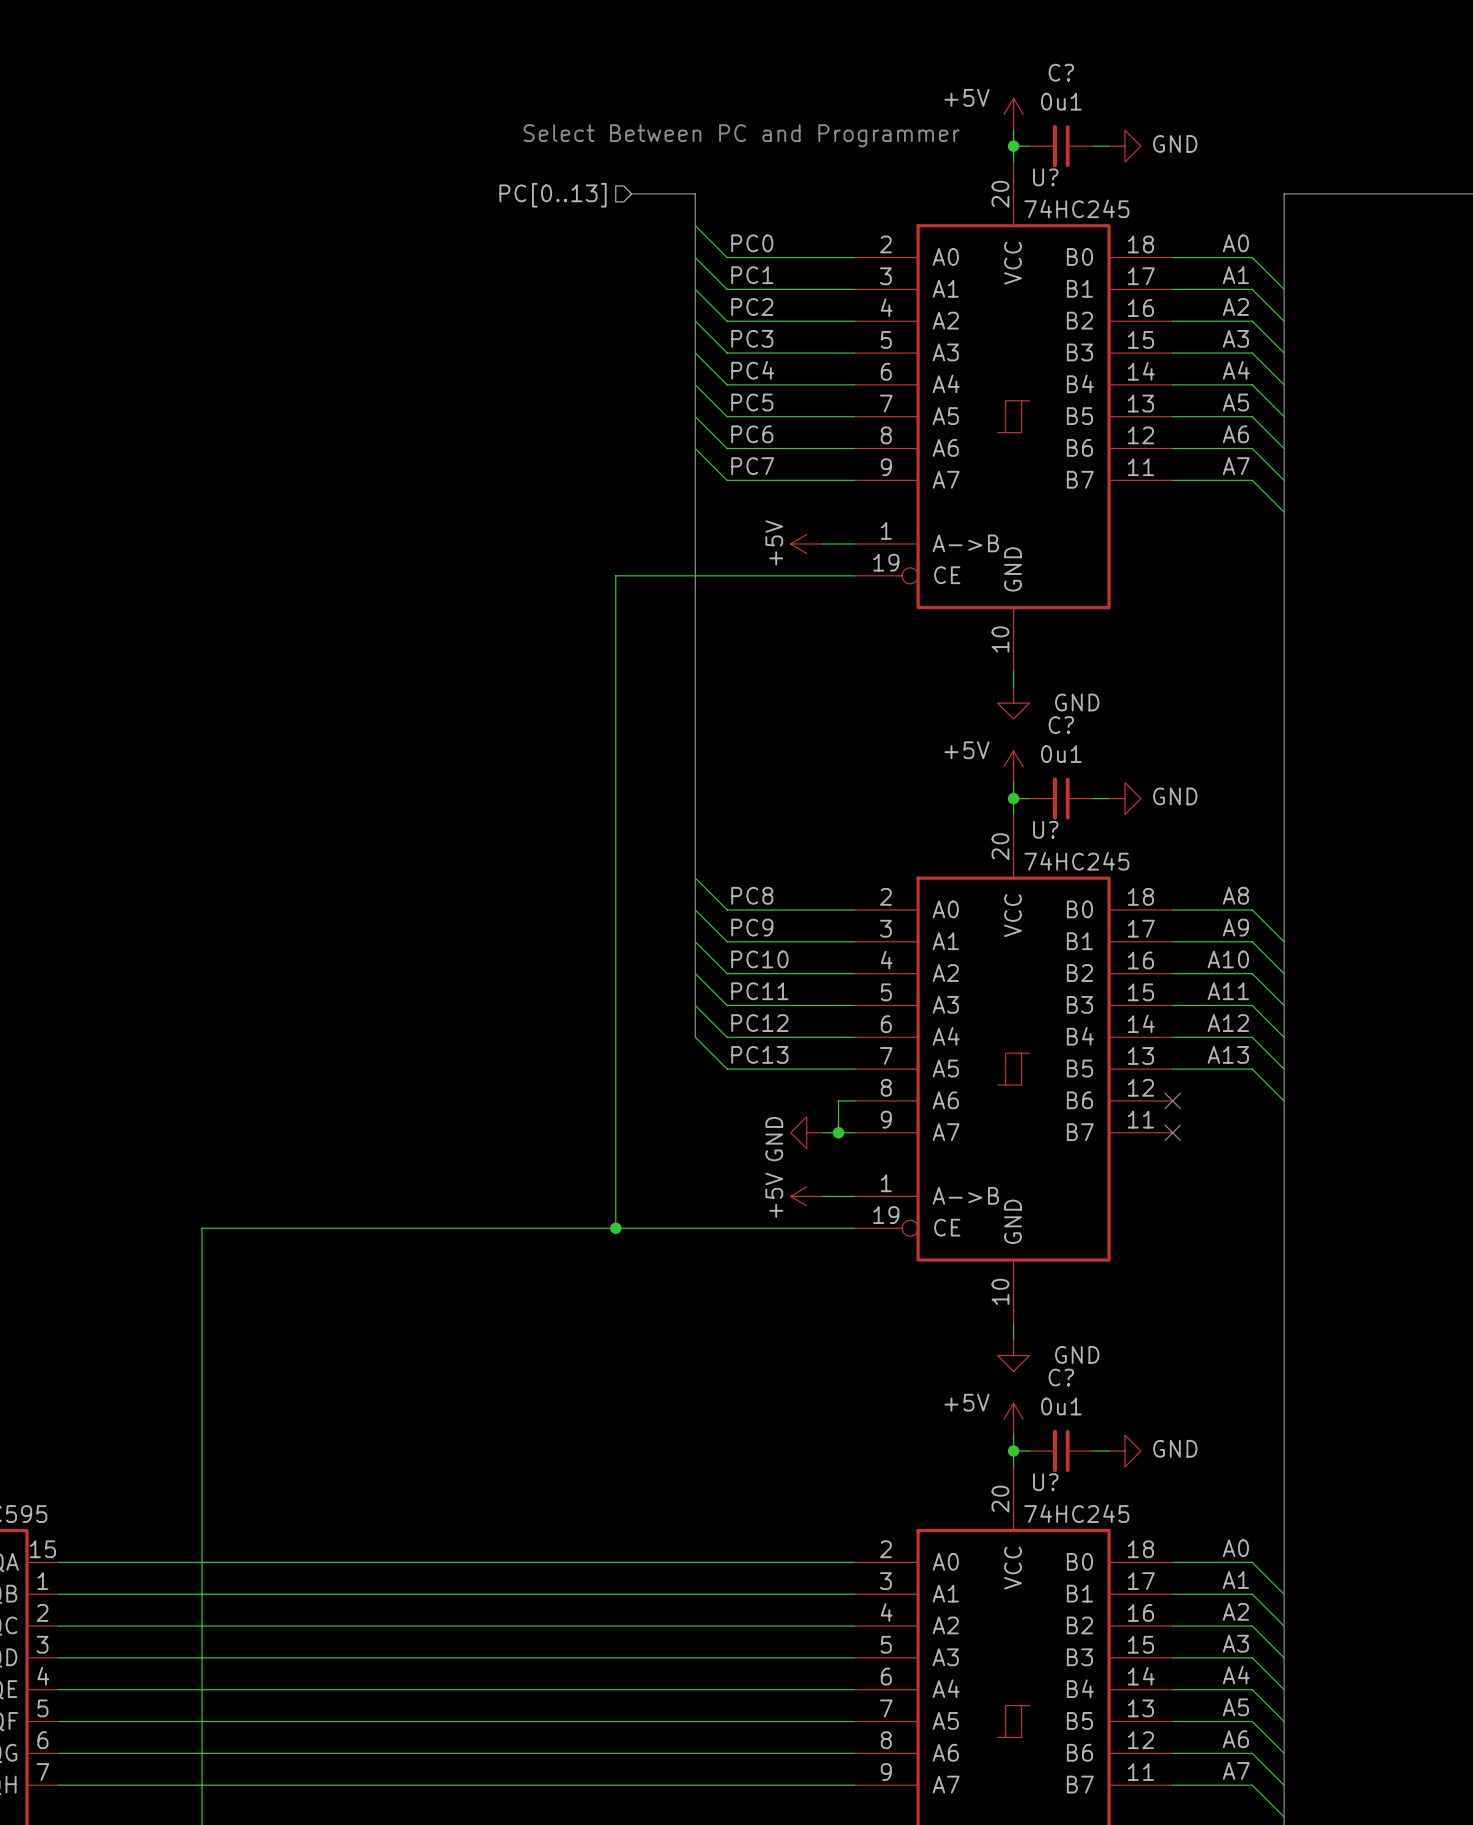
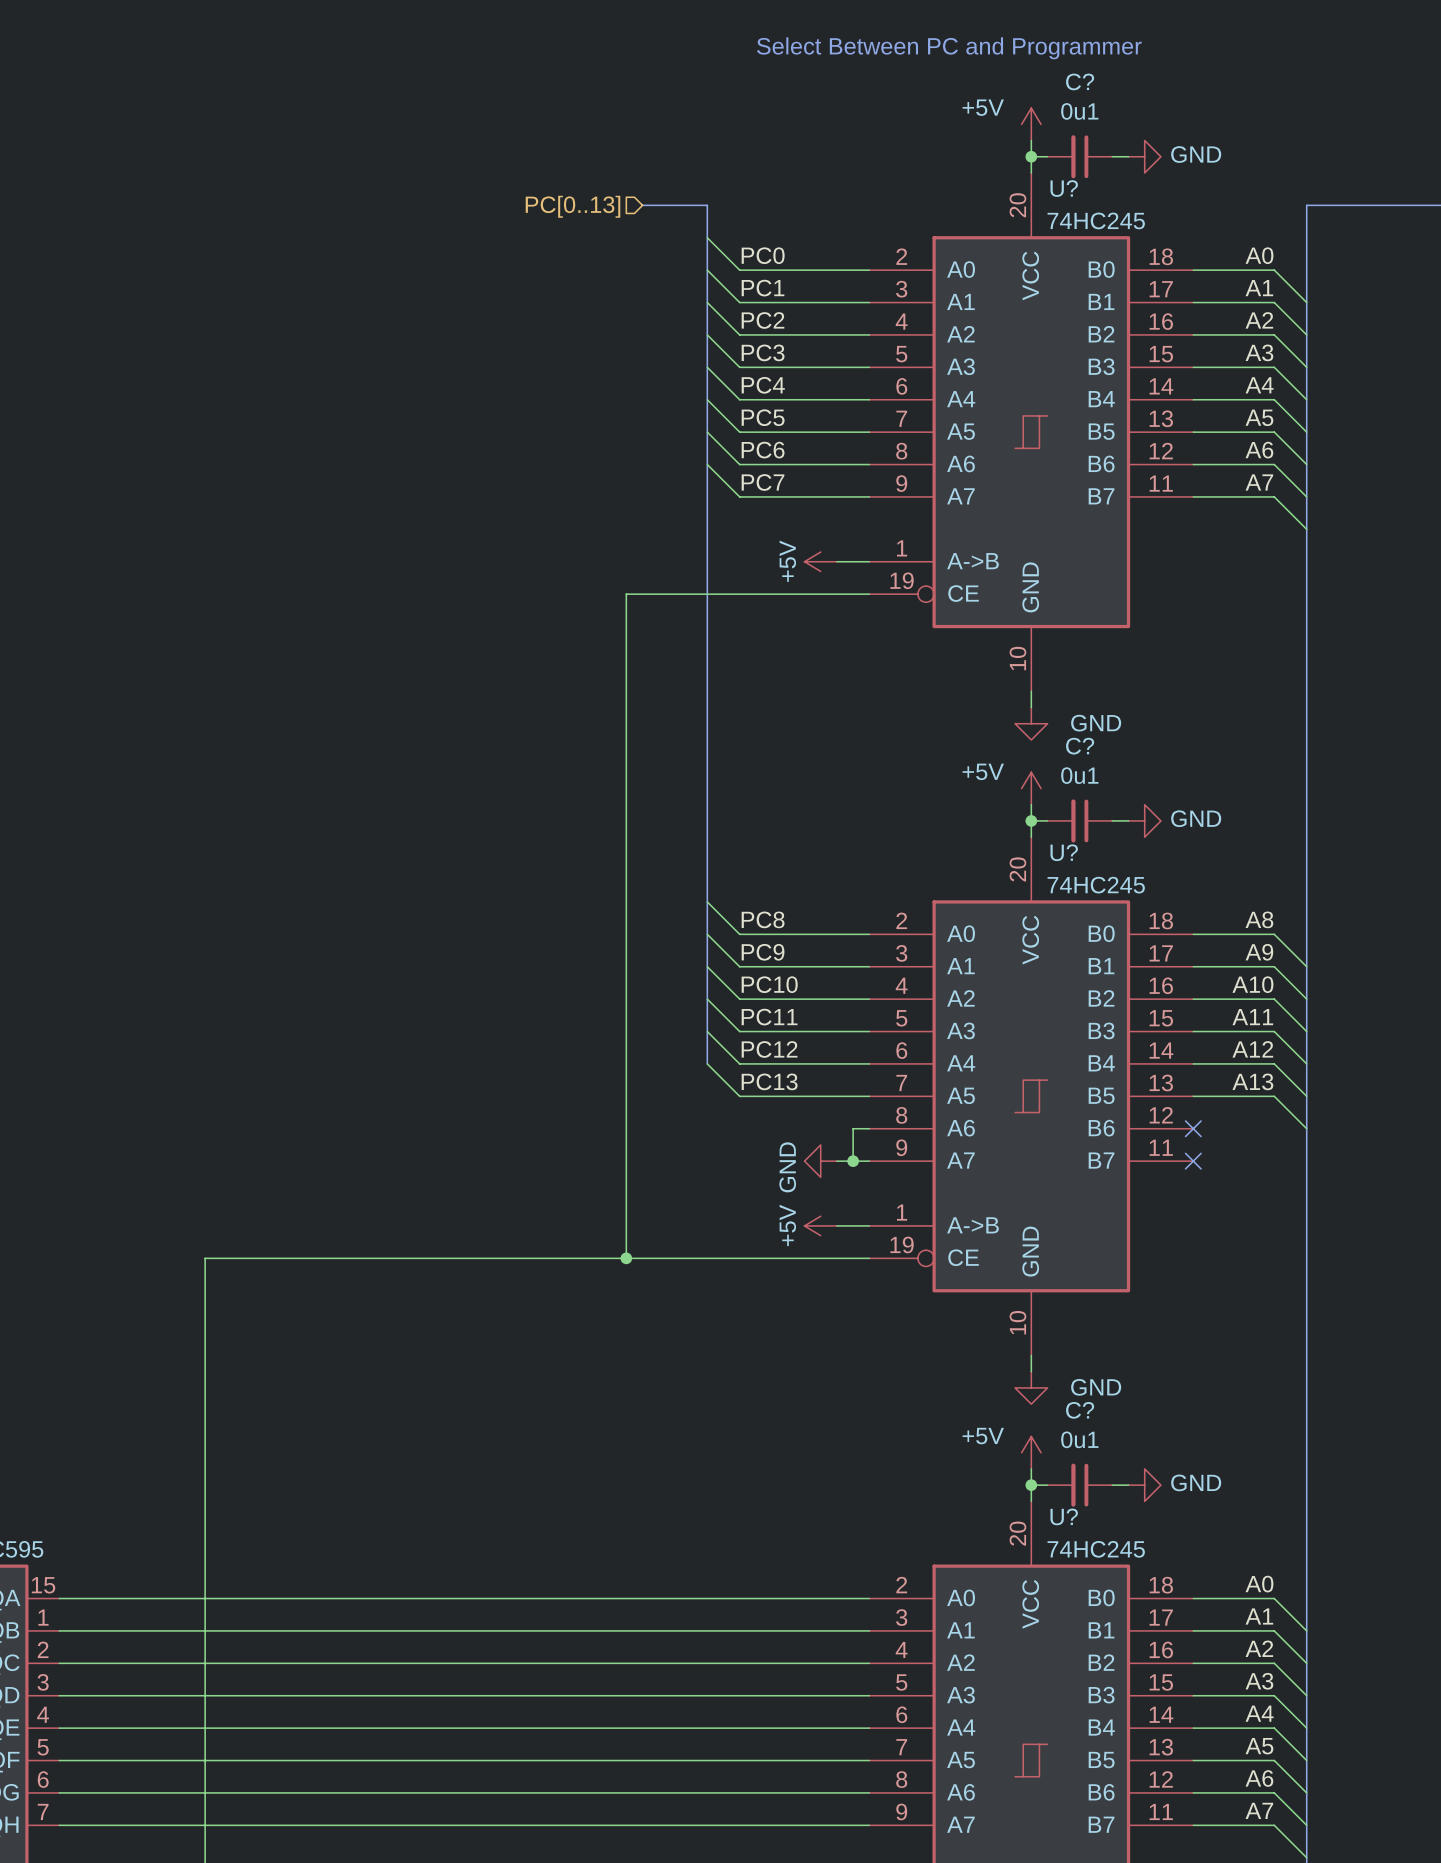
text position: Select Between PC and Programmer (741, 135) -> Select Between PC and Programmer (949, 48)

